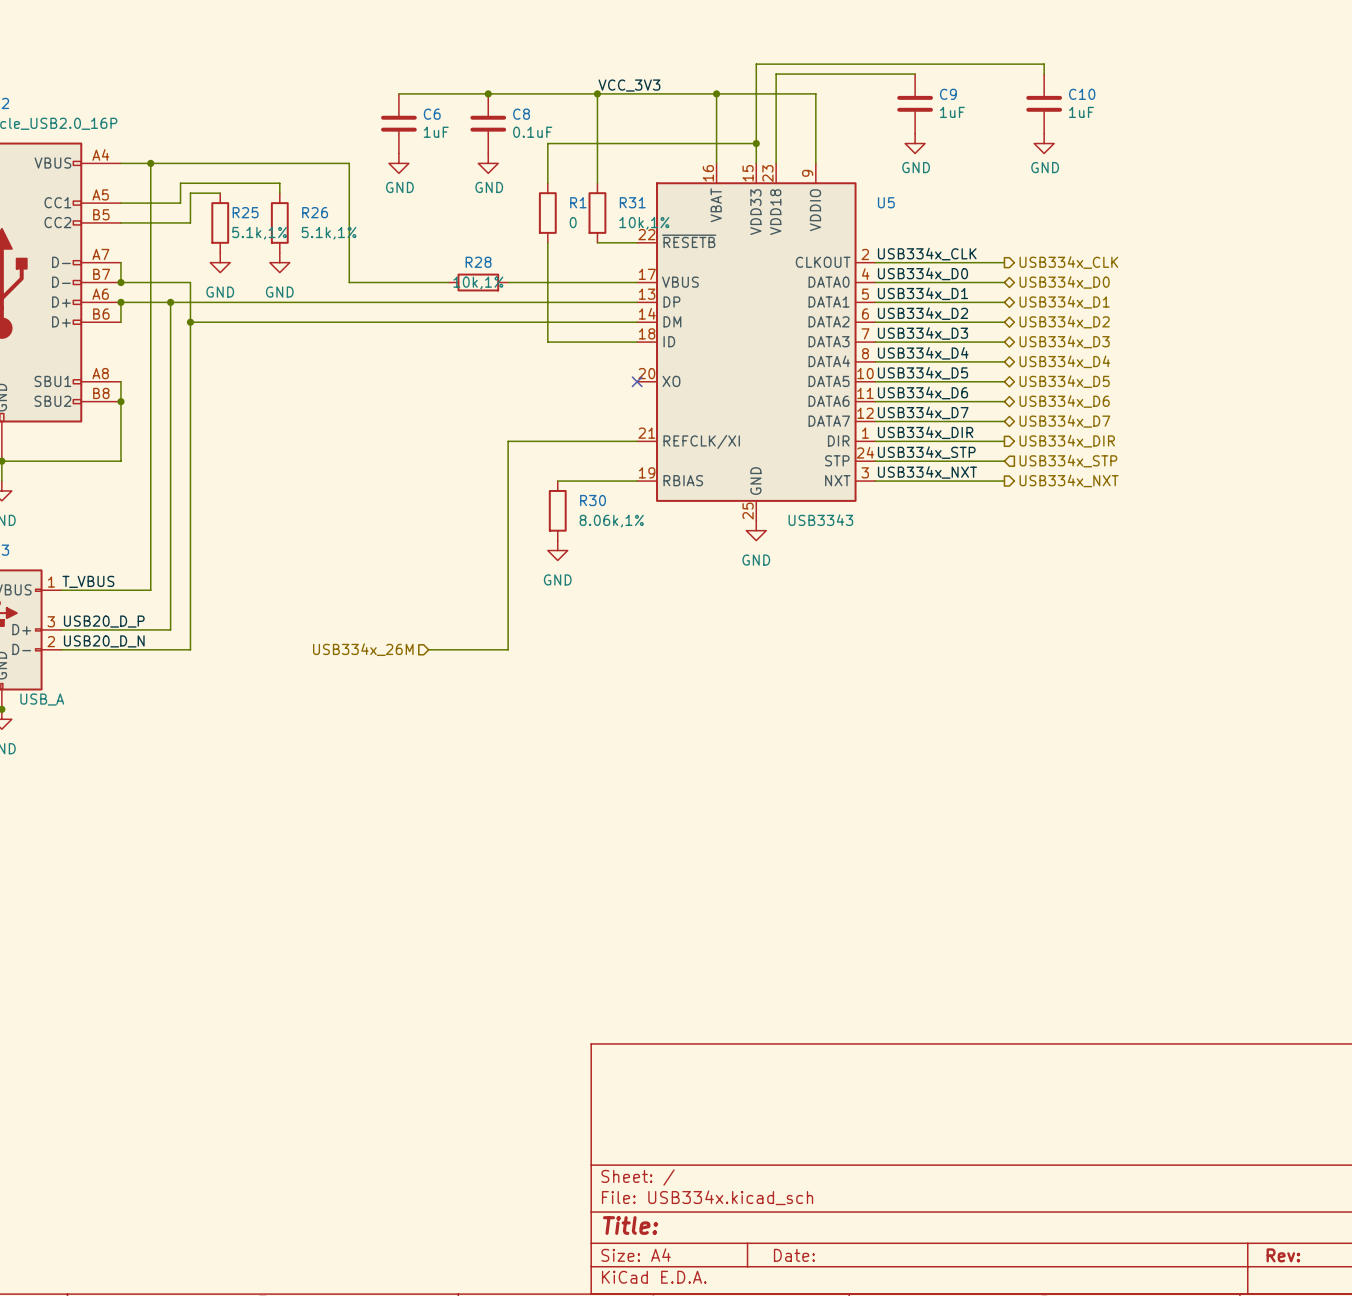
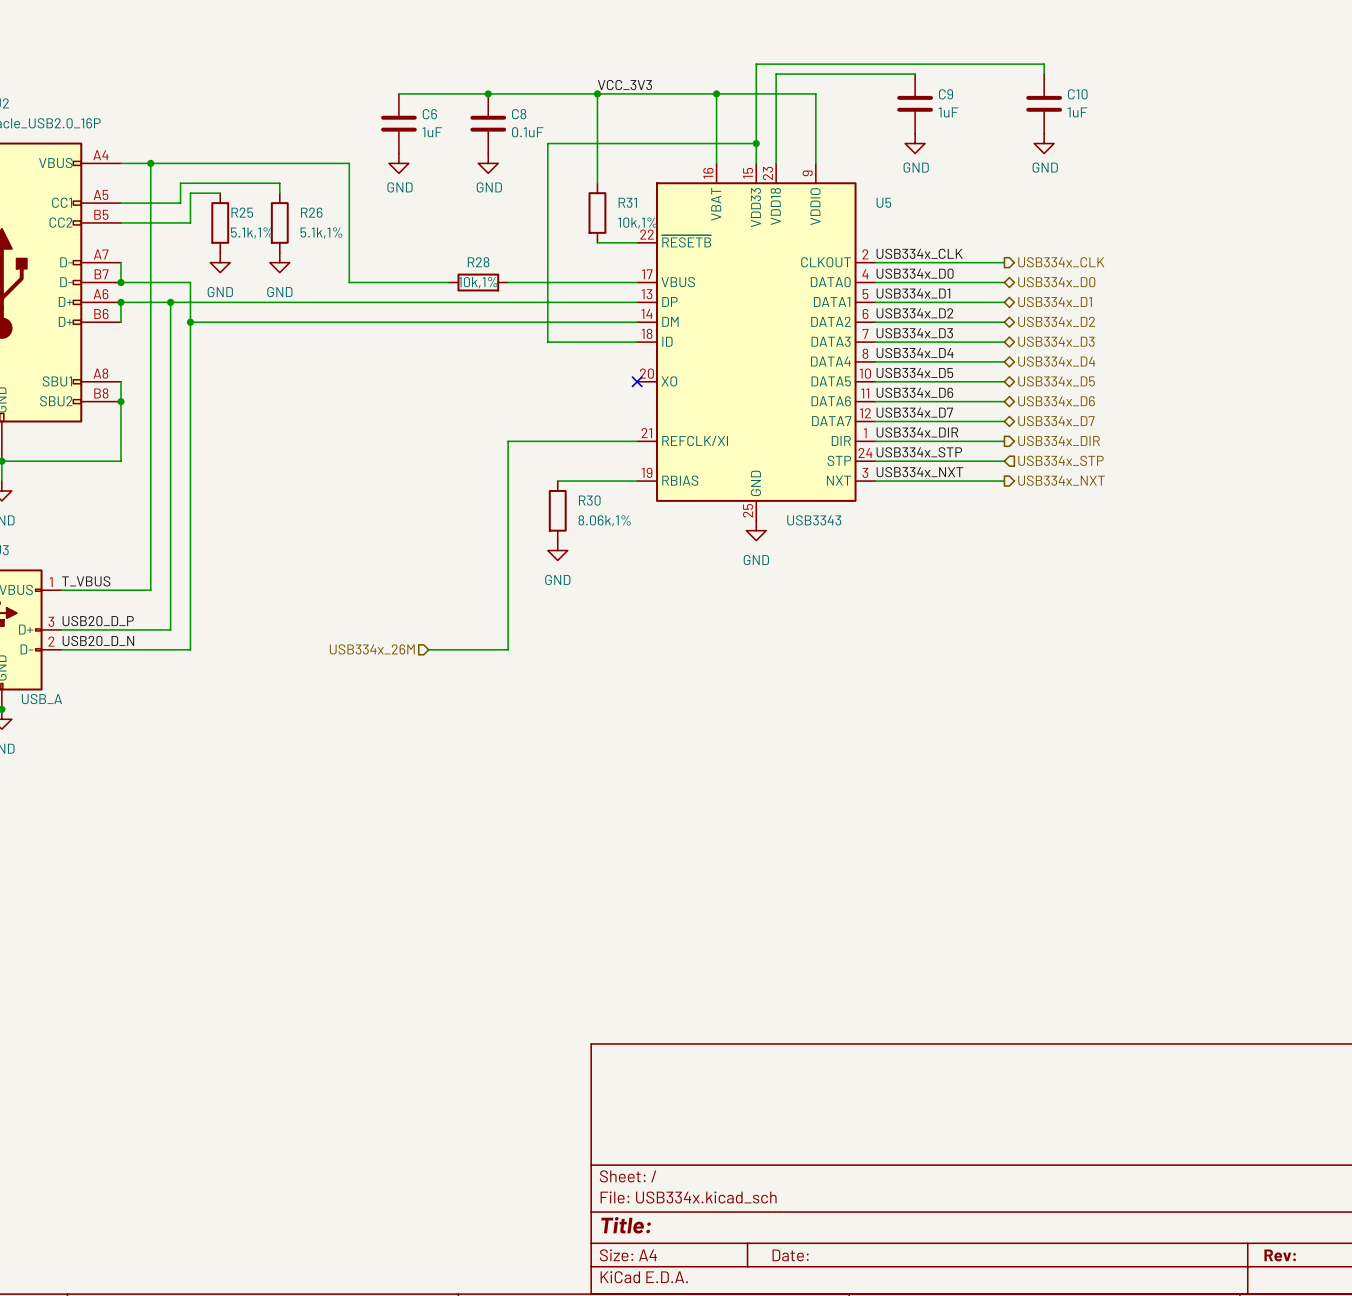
wire: none -> (547, 183) (547, 242)
R1: 0 (547, 213) -> none

